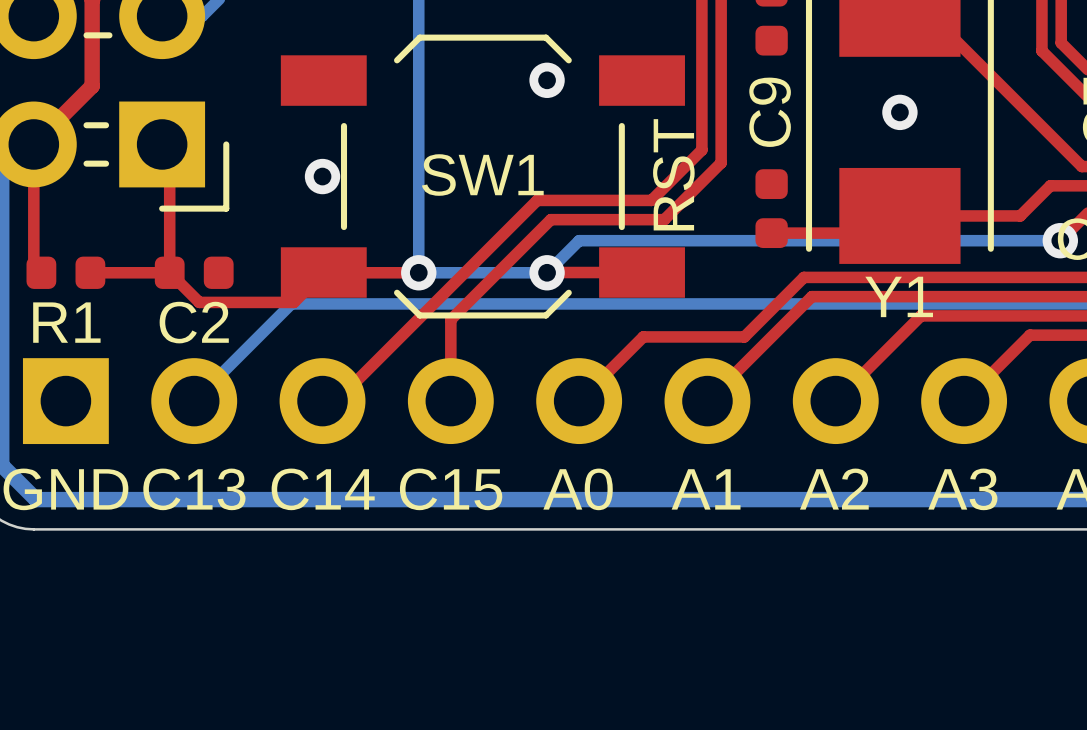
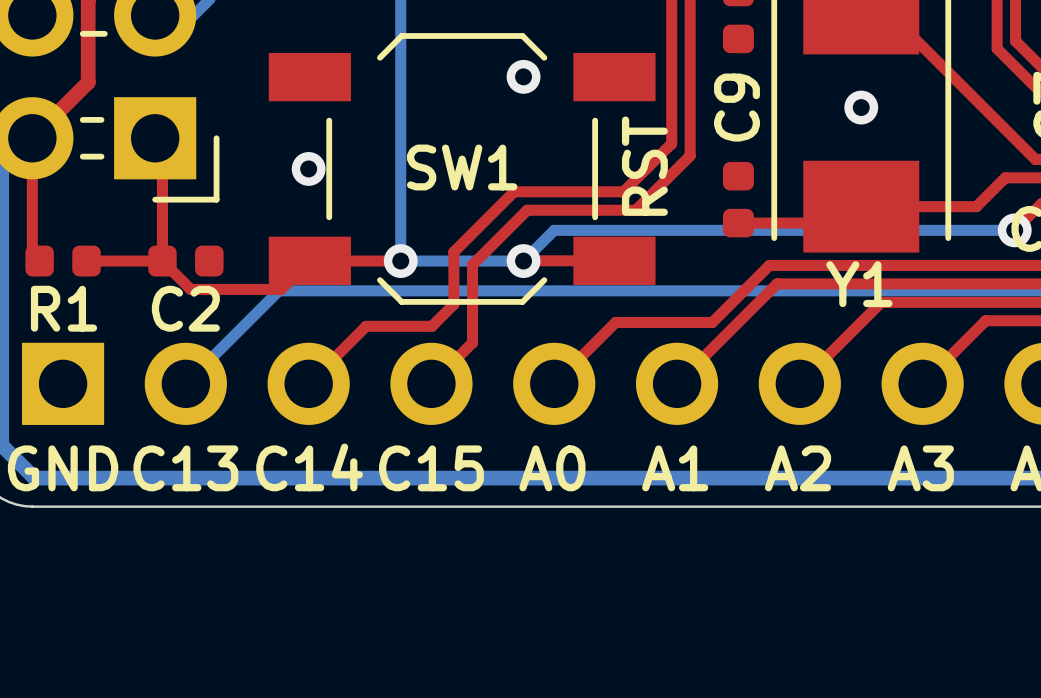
top track: (474, 263) (336, 401) (322, 401) -> (453, 252) (453, 304) (431, 326) (366, 326) (308, 383)
top track: (493, 276) (450, 319) (450, 401) -> (472, 264) (472, 342) (431, 383)

